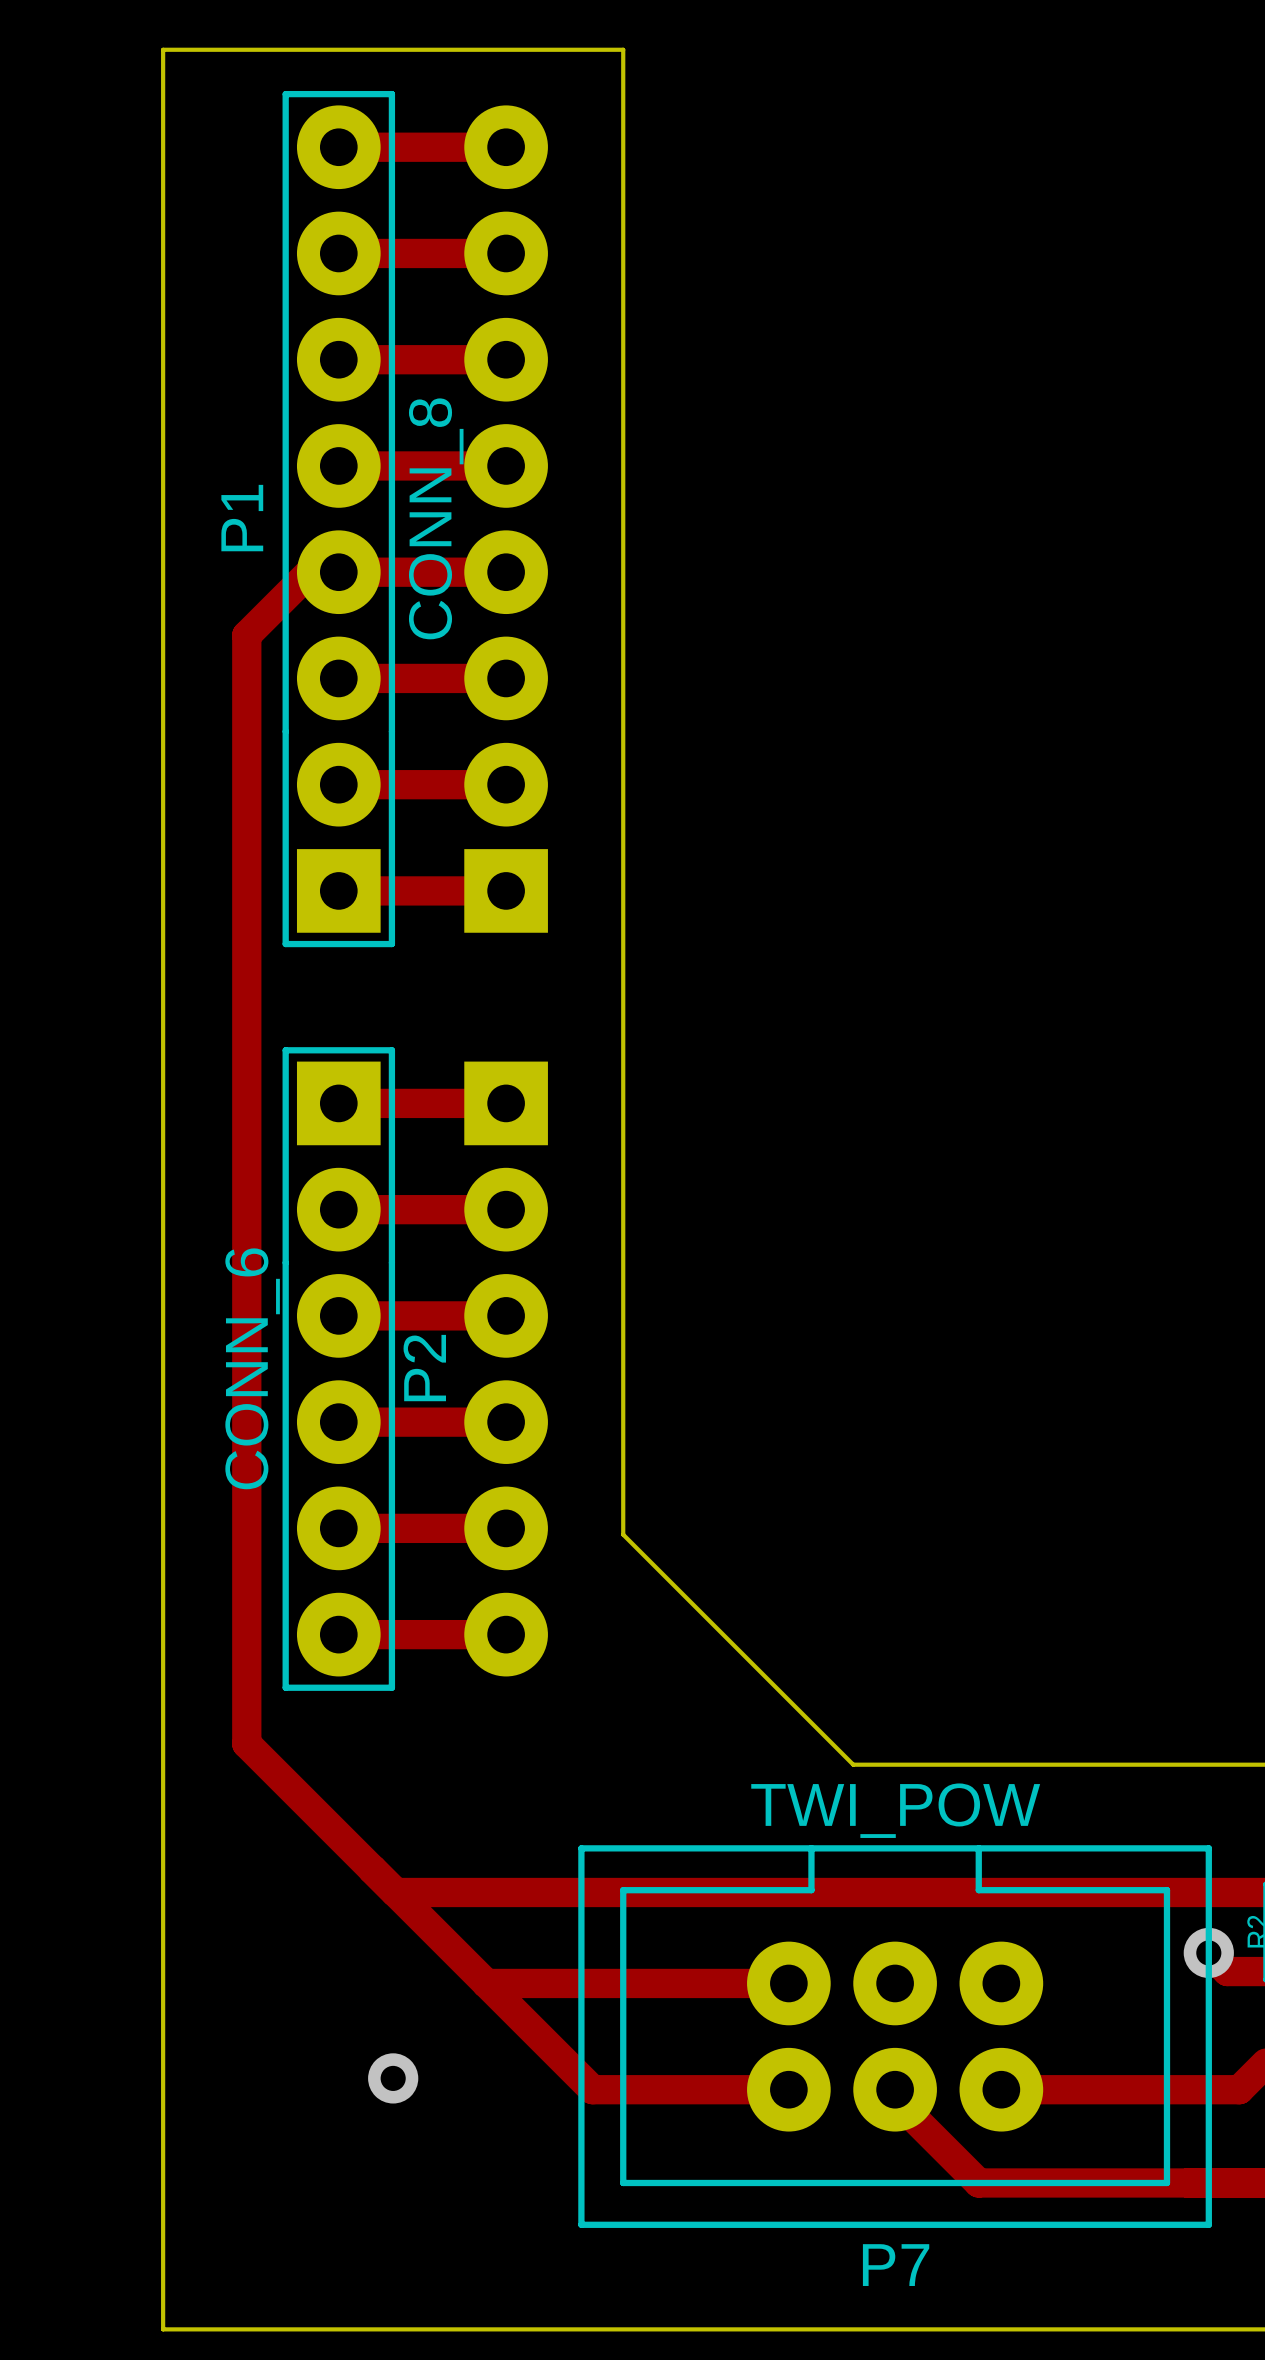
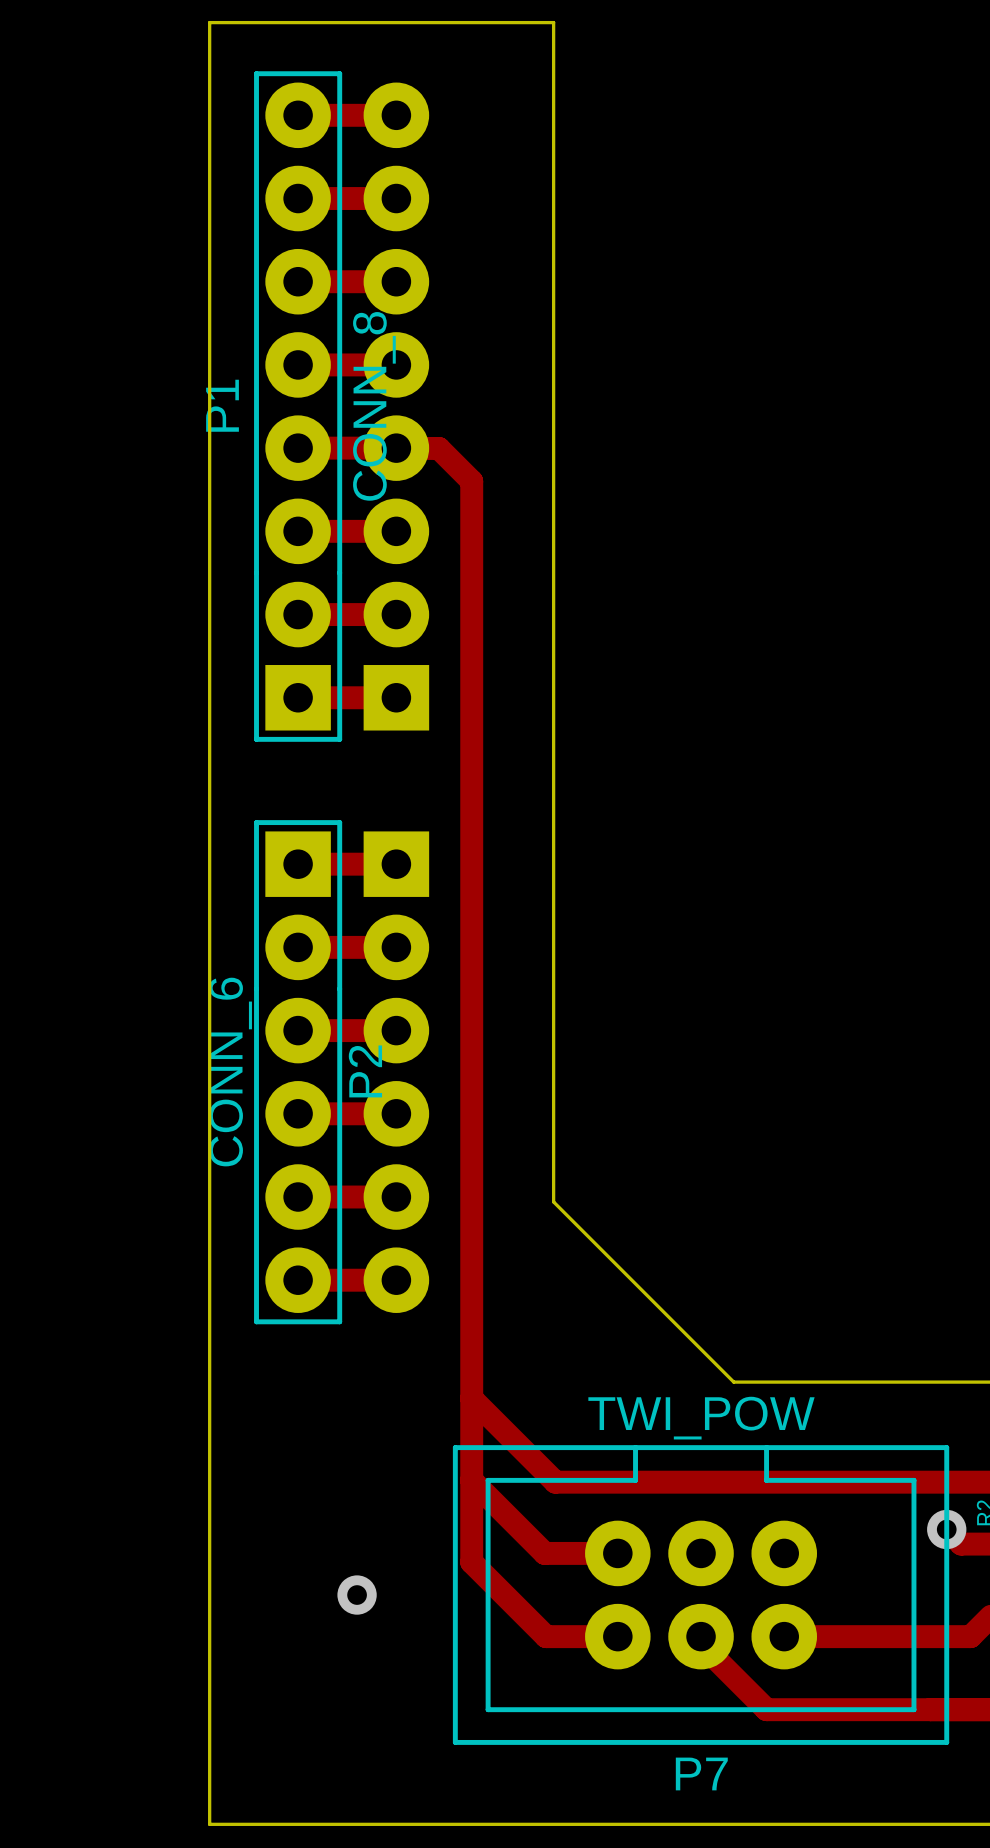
P1 position: (338, 519) -> (298, 406)
track: (380, 572) (309, 572) (246, 635) (246, 1743) (592, 2089) (697, 2089) -> (396, 448) (438, 448) (471, 481) (471, 1562) (546, 1636)
P2 position: (338, 1369) -> (298, 1072)
board edge: (936, 1764) (853, 1764) (623, 1534) (623, 49) (163, 49) (163, 2329) (267, 2329) -> (733, 1382) (553, 1201) (553, 22) (209, 22) (209, 1824)
track: (395, 1892) (709, 1892) -> (471, 1398) (555, 1482)
track: (486, 1983) (695, 1983) -> (471, 1480) (544, 1553)
via position: (393, 2078) -> (357, 1595)

